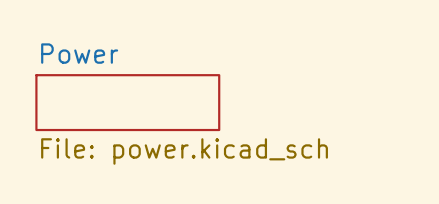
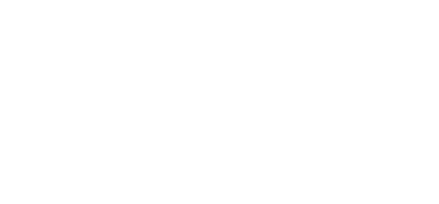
sheet Power: File: power.kicad_sch (127, 102) -> none

